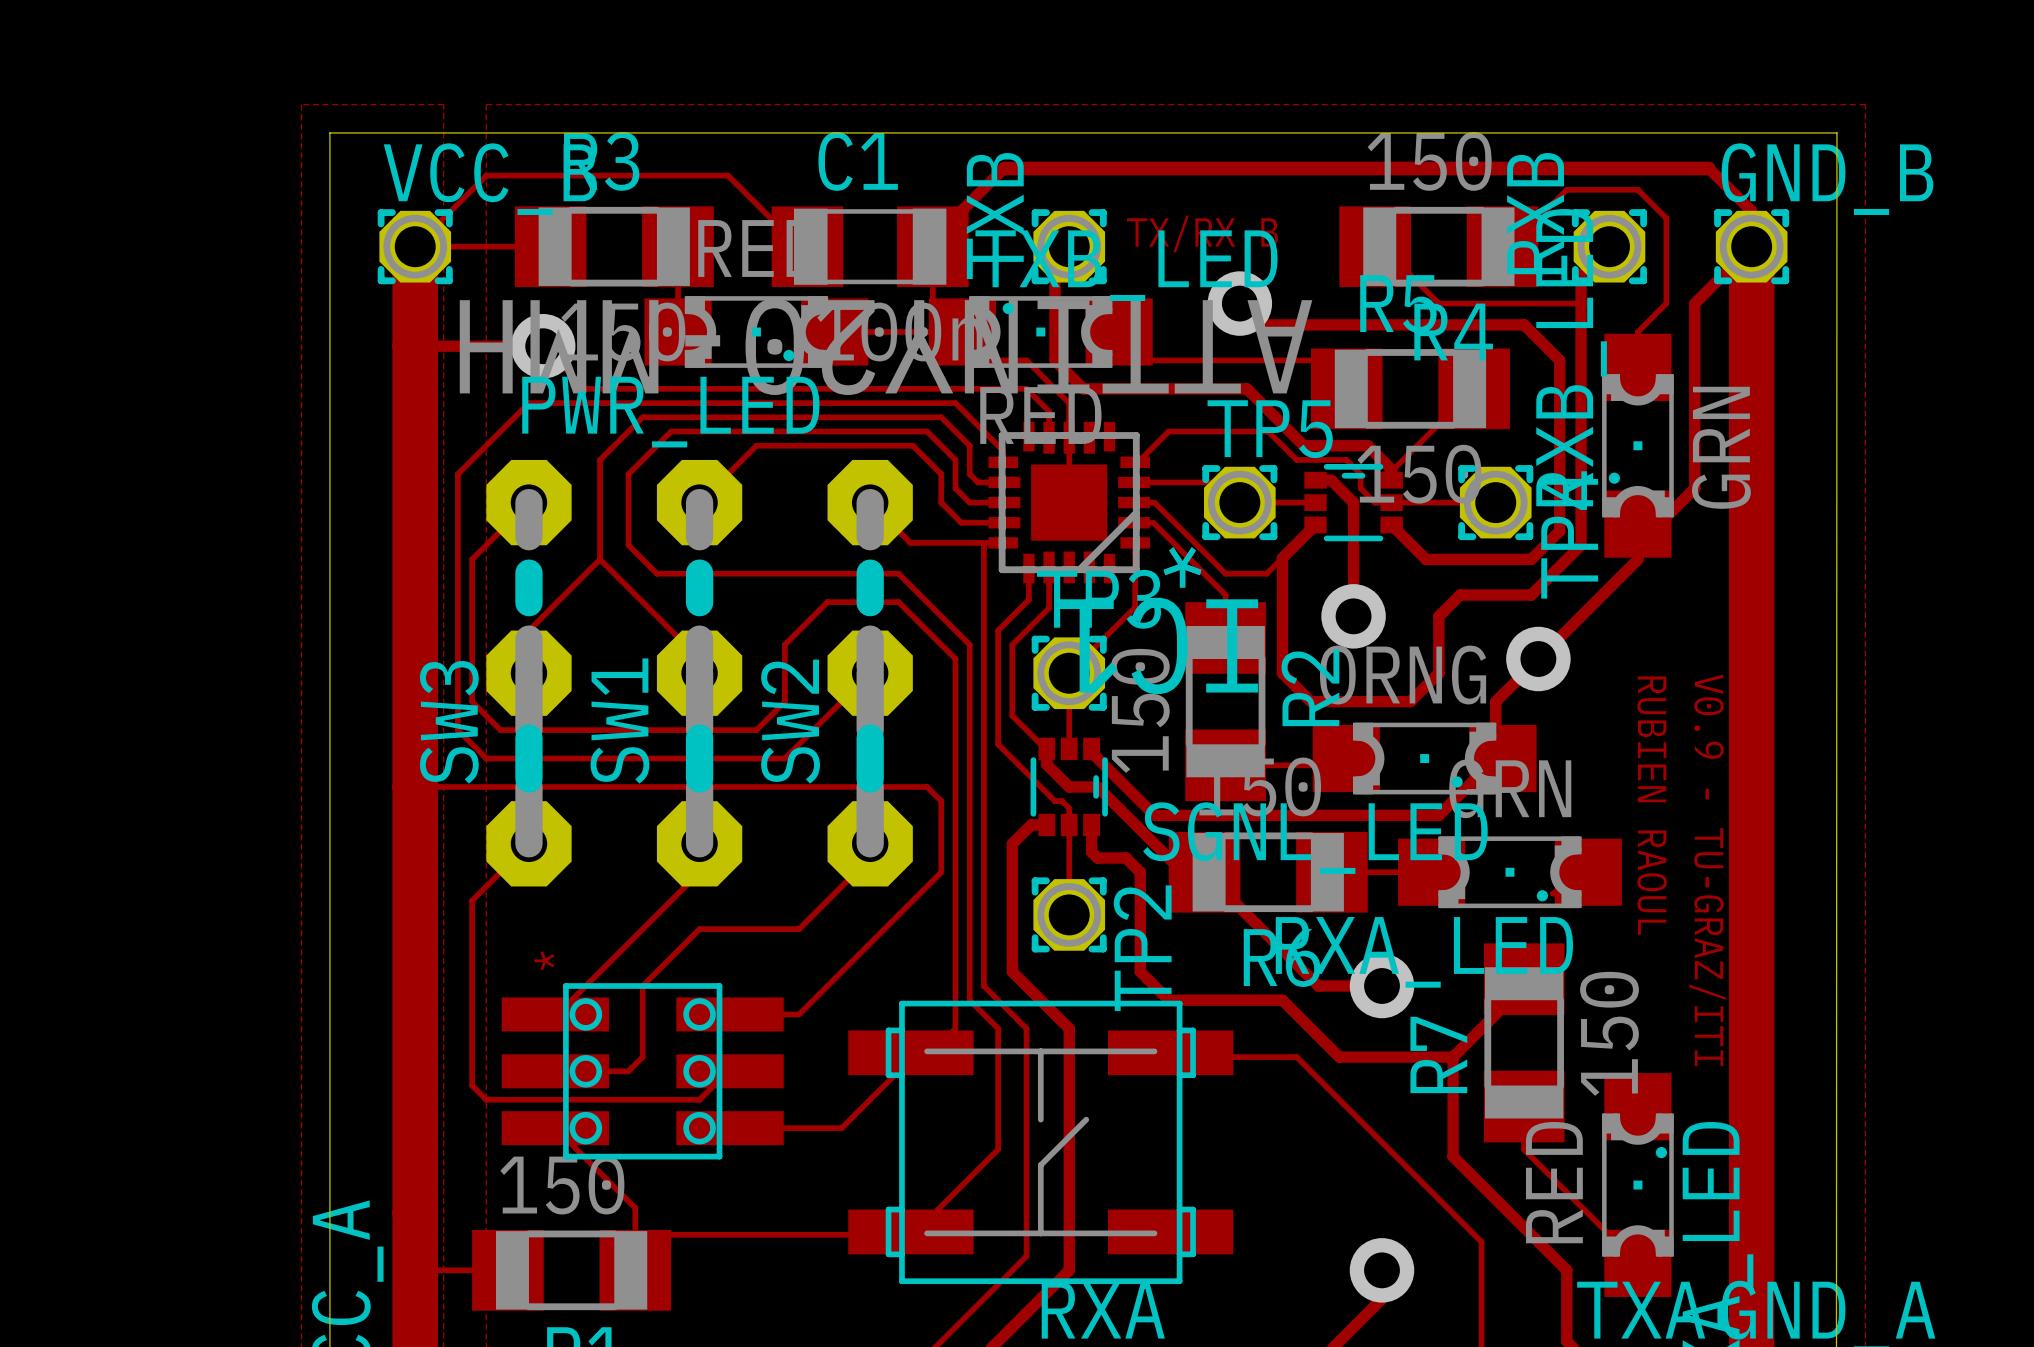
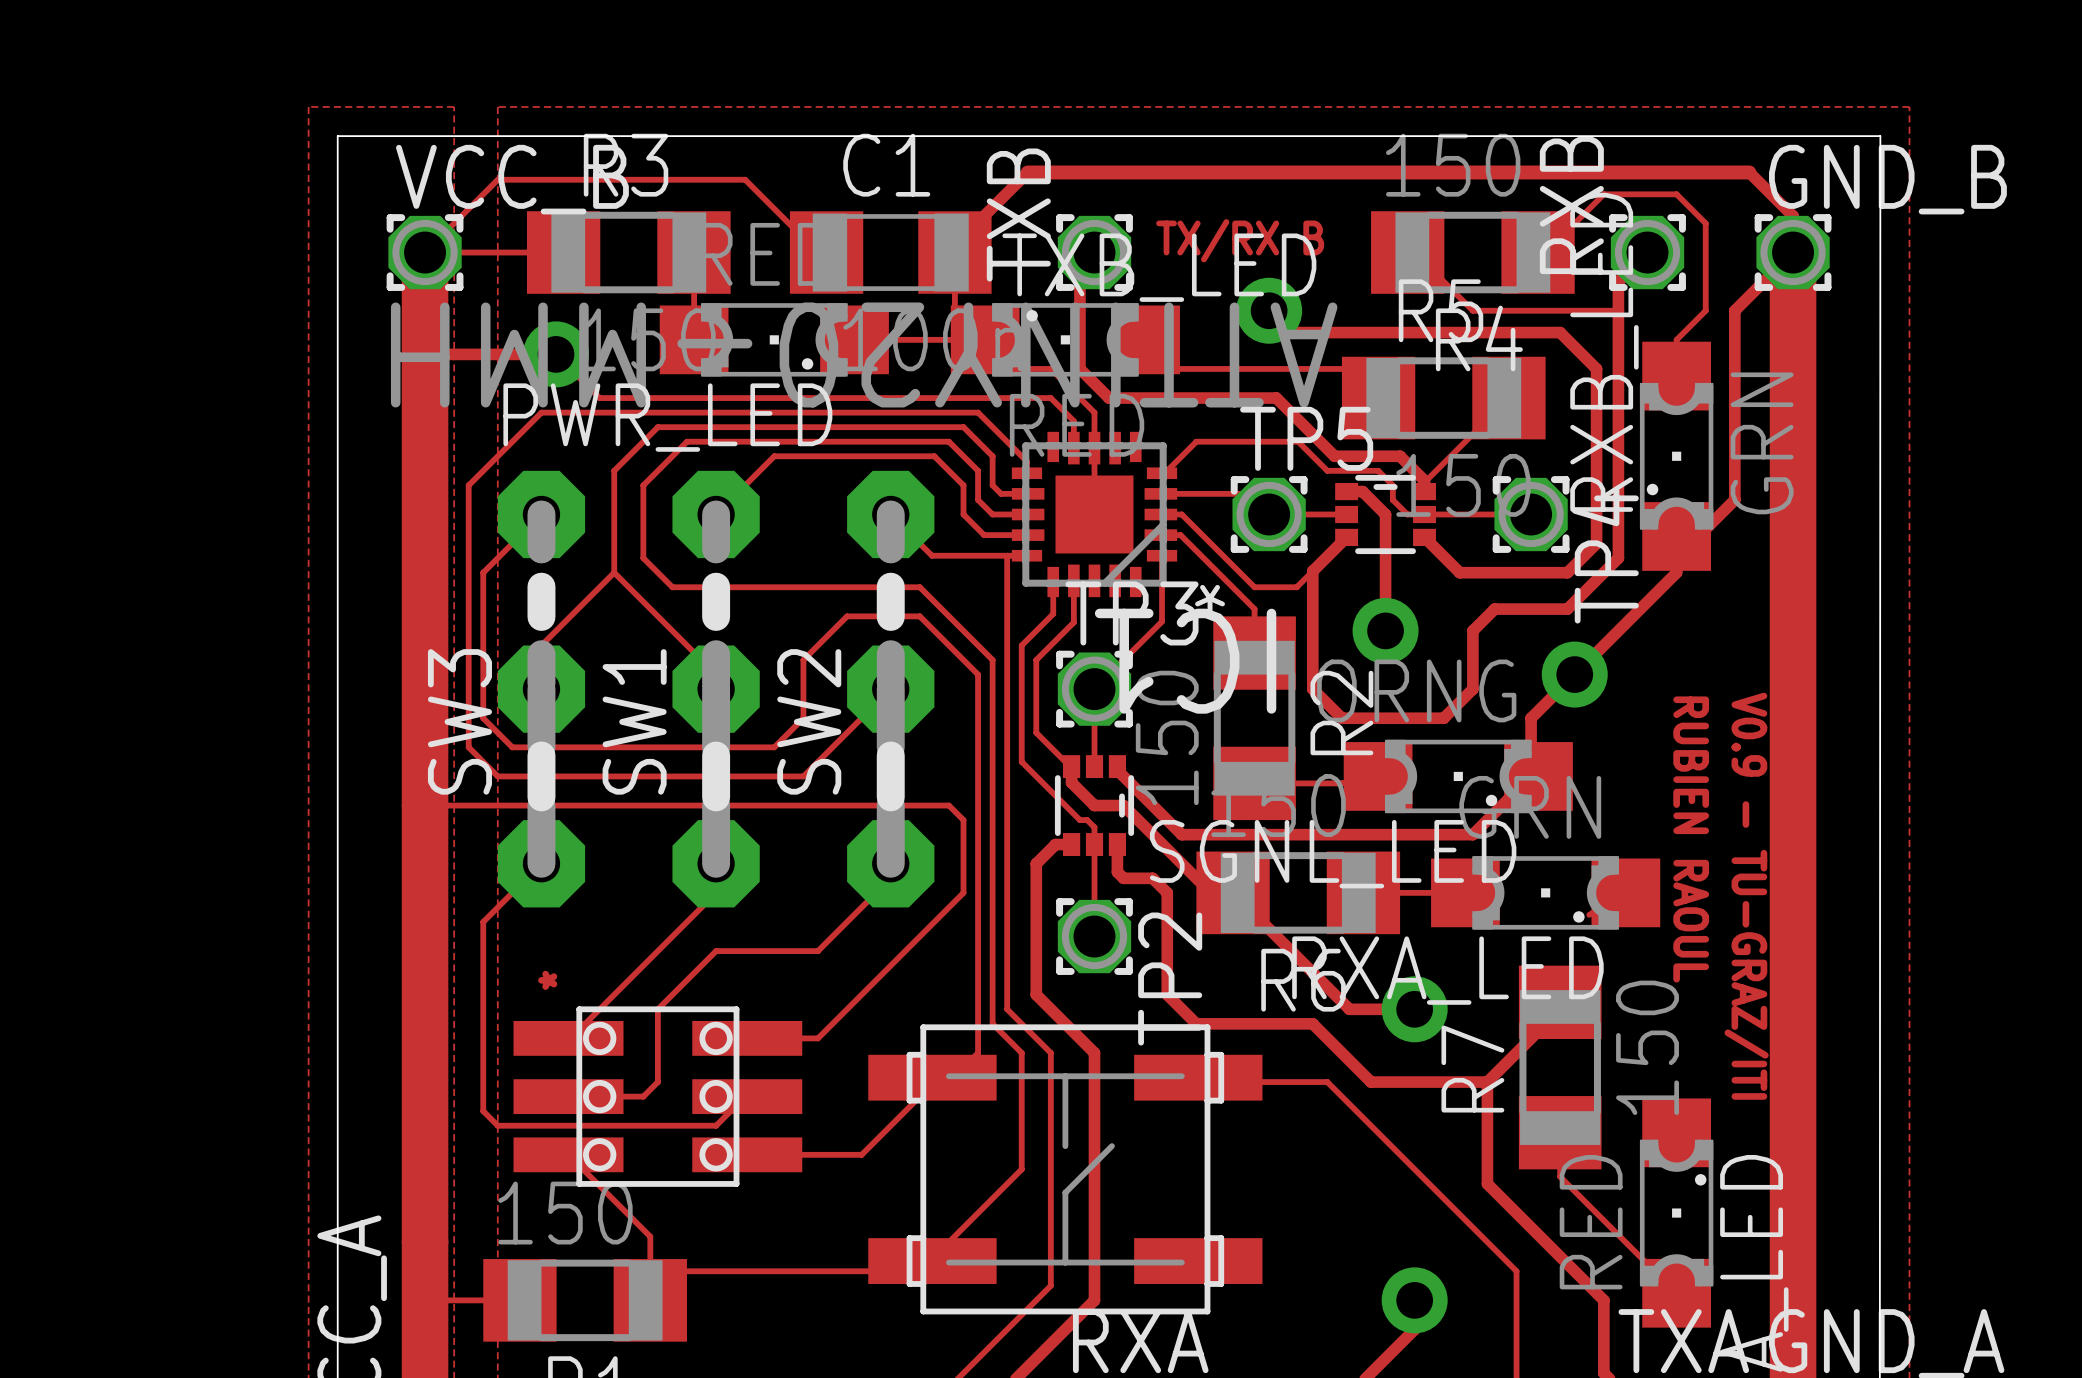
top track: (998, 1142) (998, 1149) (912, 1234) (656, 1234) (635, 1256) (635, 1270) -> (1021, 1169) (919, 1271) (657, 1271)

